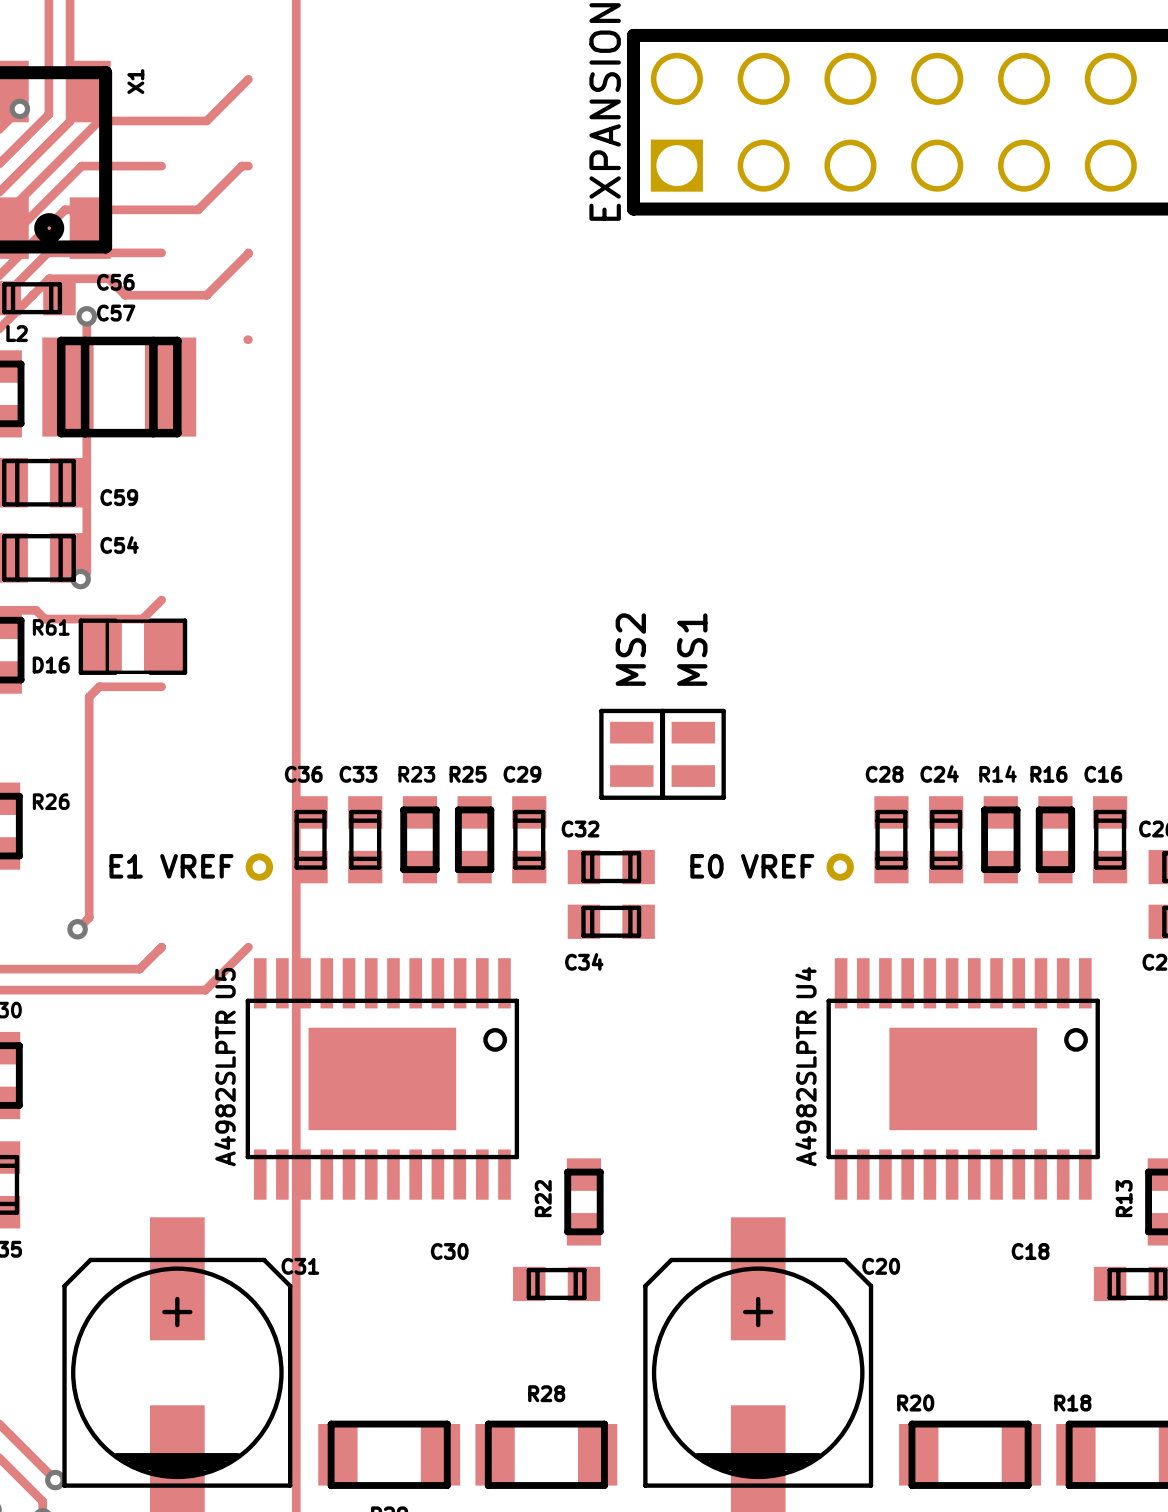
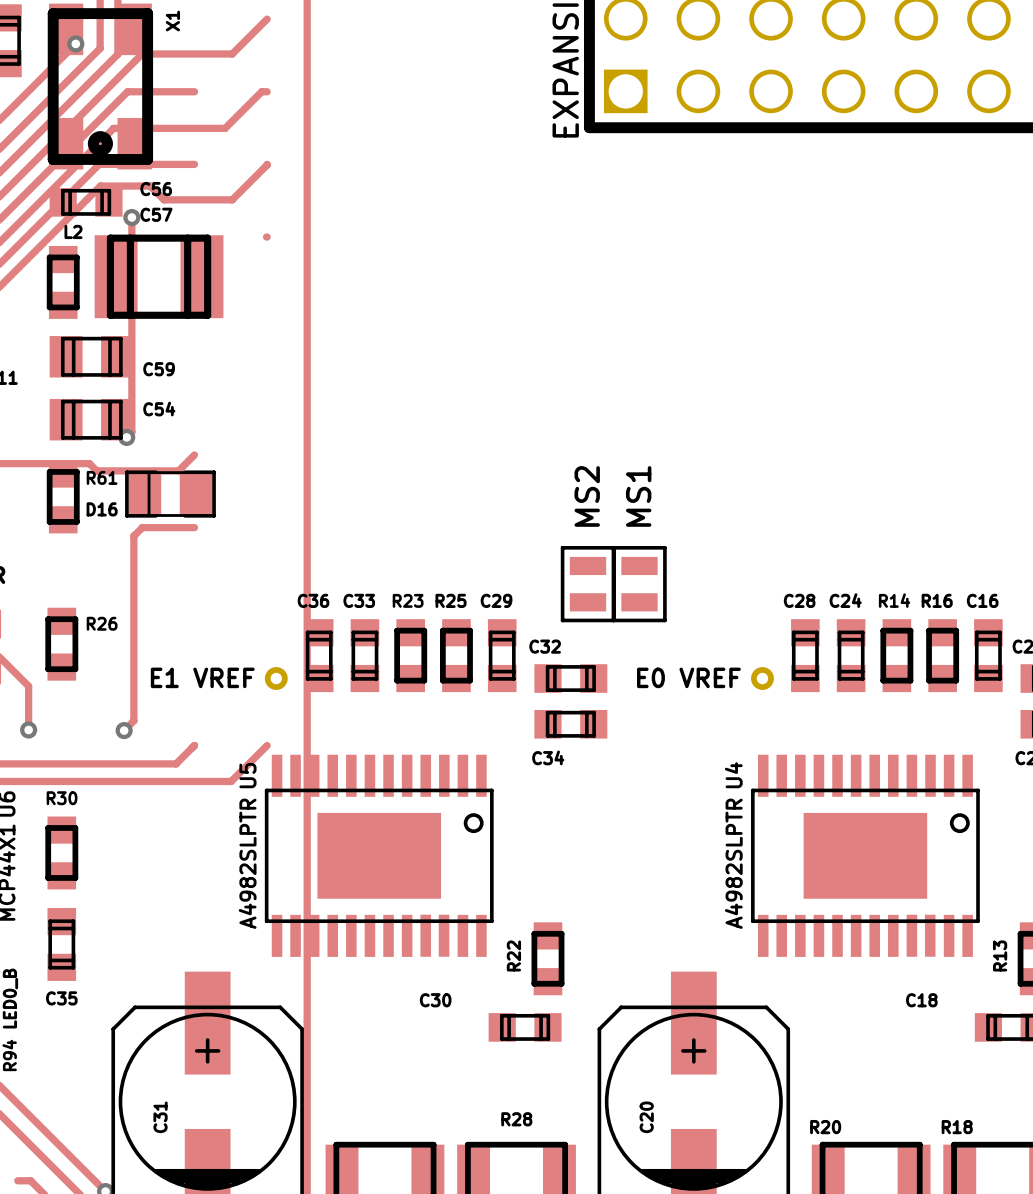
C31 name rotation: 0° (300, 1266) -> 90° counterclockwise (160, 1117)
C31 name position: C31 (300, 1266) -> C31 (160, 1117)
C20 name rotation: 0° (881, 1266) -> 90° counterclockwise (646, 1117)
C20 name position: C20 (881, 1266) -> C20 (646, 1117)

